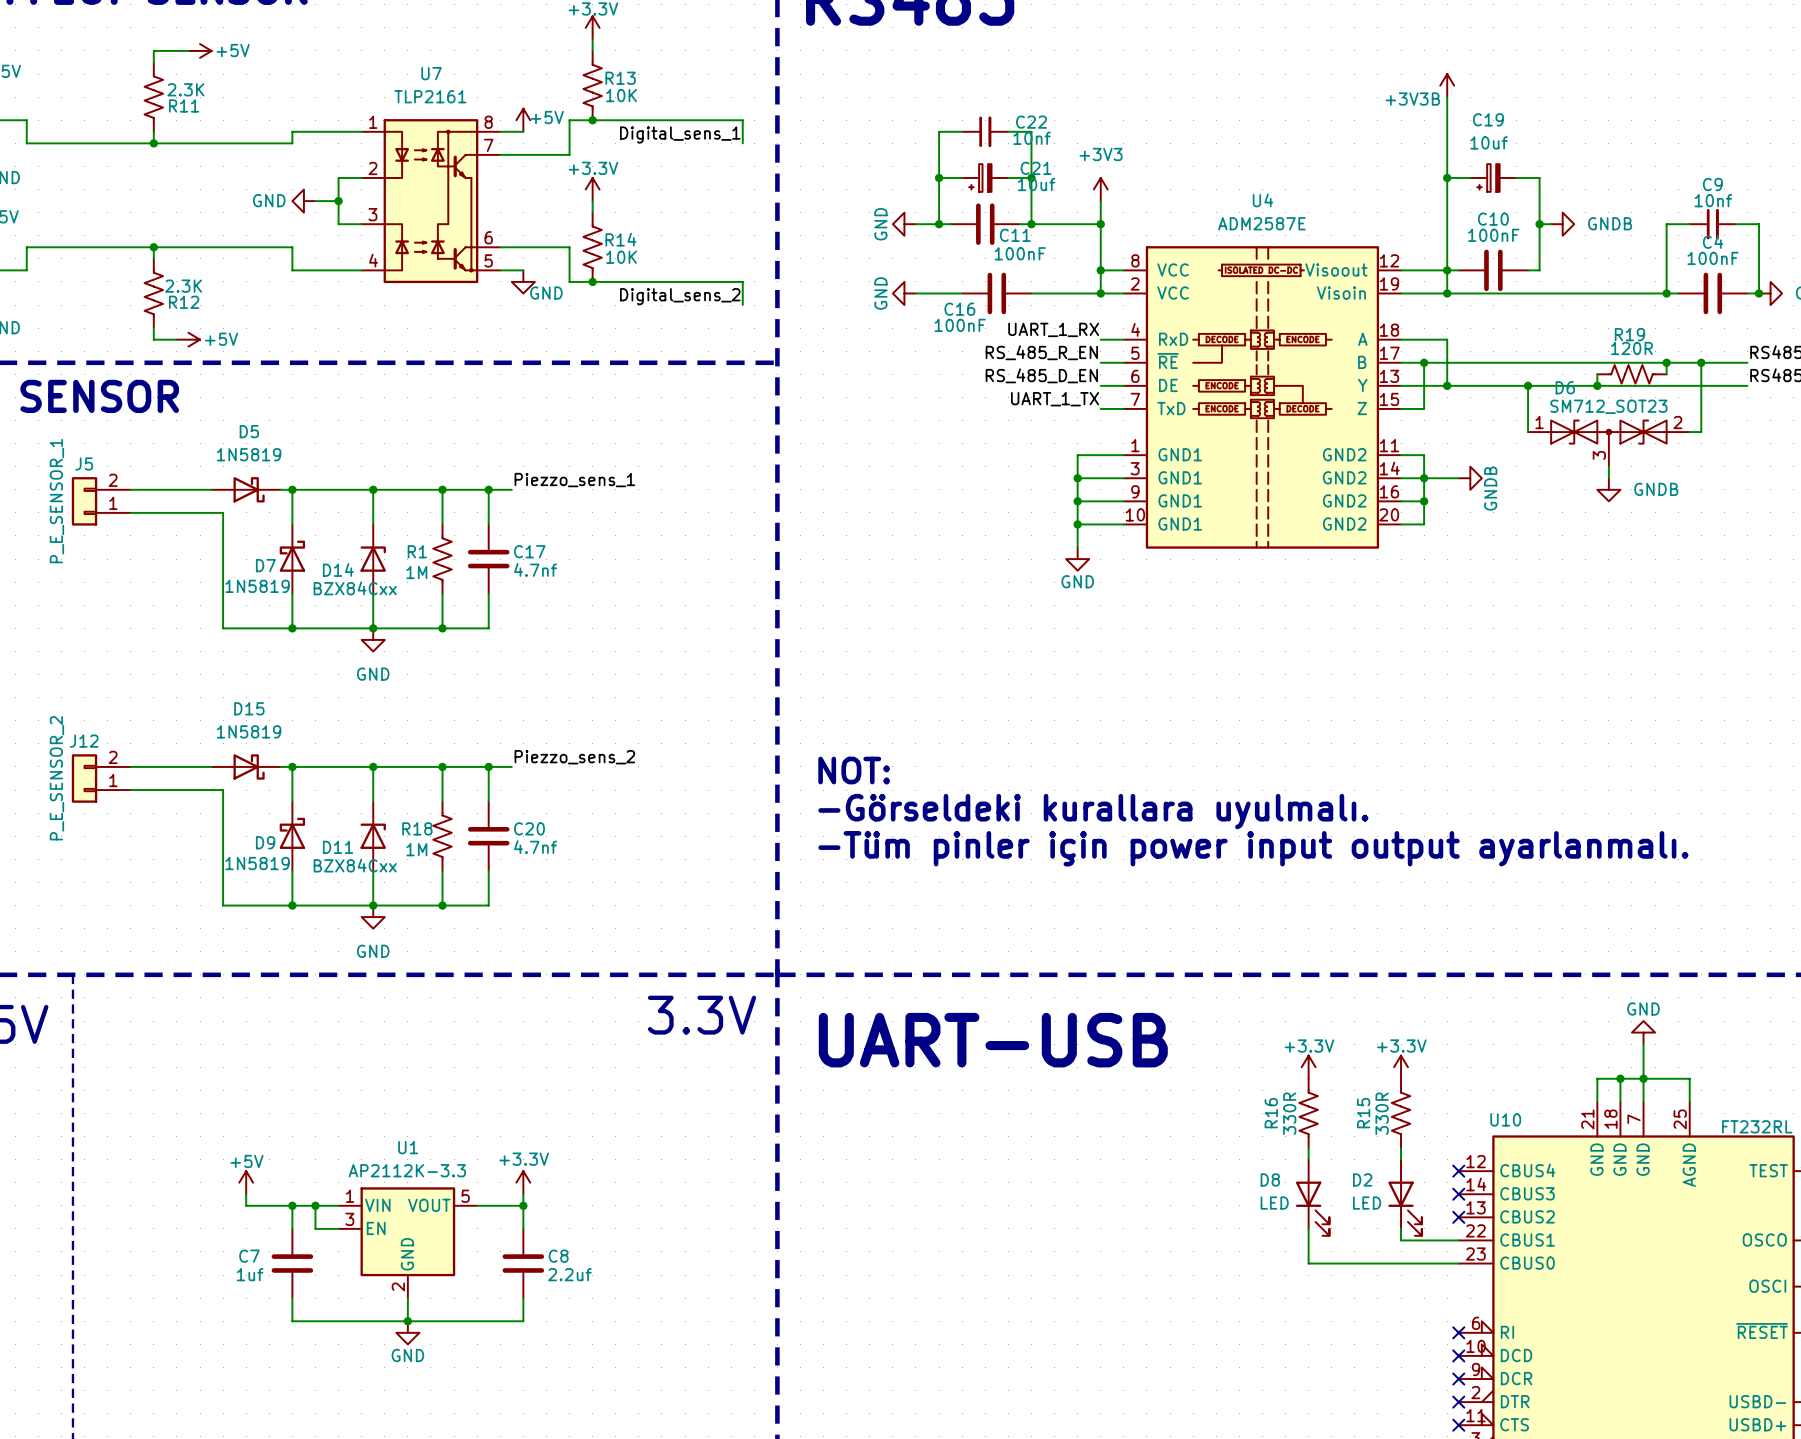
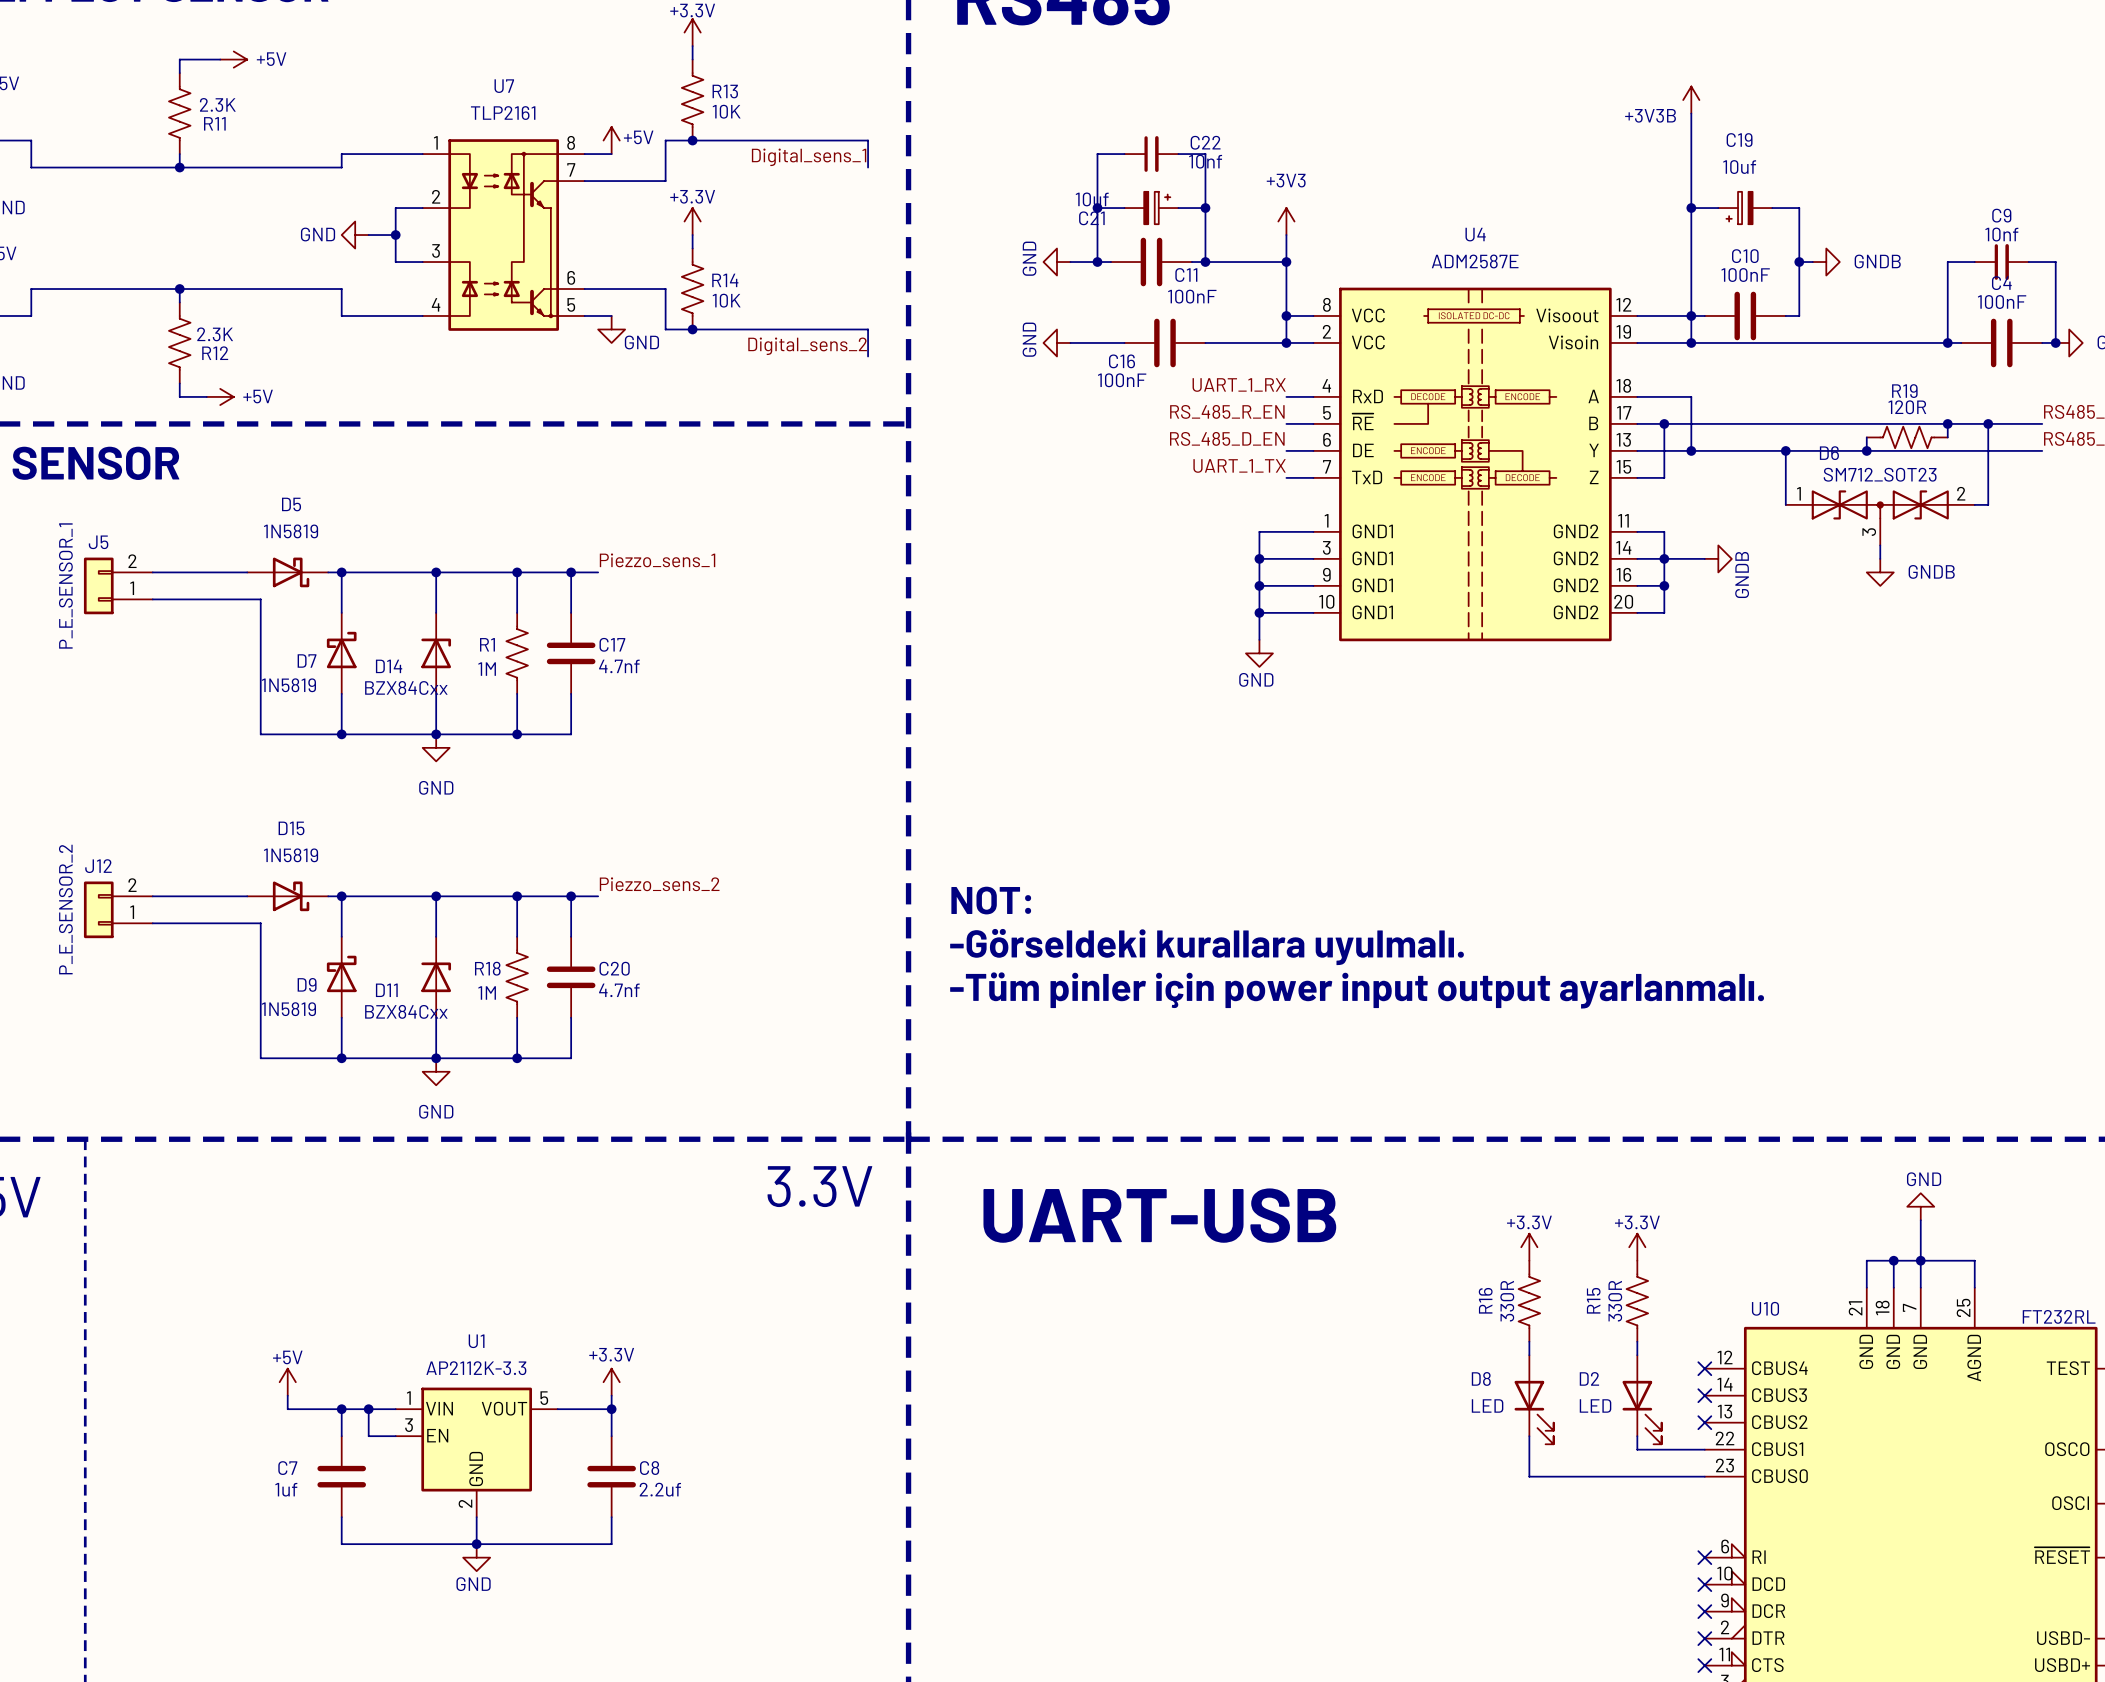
C21 rotation: 0° (980, 178) -> 180° (1157, 208)

